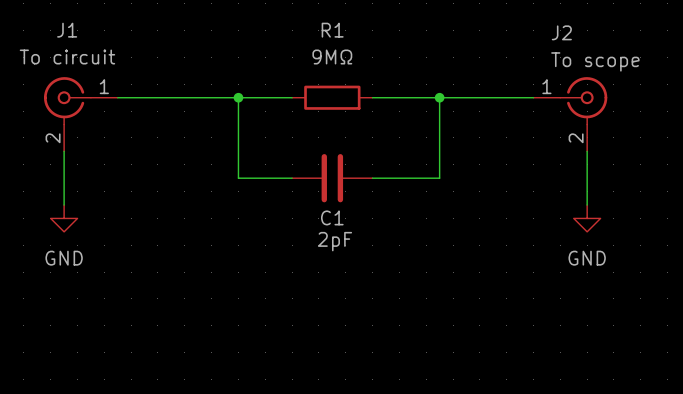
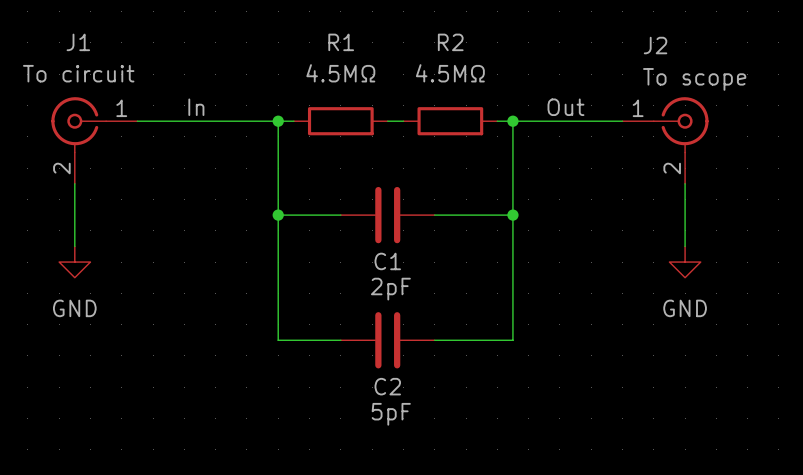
R1 value: 9MΩ (332, 56) -> 4.5MΩ (340, 73)
label: none -> In (196, 107)
label: none -> Out (565, 107)
wire: (251, 97) (292, 97) -> none
wire: none -> (387, 121) (403, 121)
R1 position: (332, 97) -> (340, 121)
wire: (372, 97) (426, 97) -> none
R2: none -> 4.5MΩ (450, 121)
wire: none -> (278, 215) (278, 340) (340, 340)
junction: none -> (278, 215)
wire: none -> (512, 215) (512, 340) (434, 340)
junction: none -> (512, 215)
C2: none -> 5pF (387, 340)

